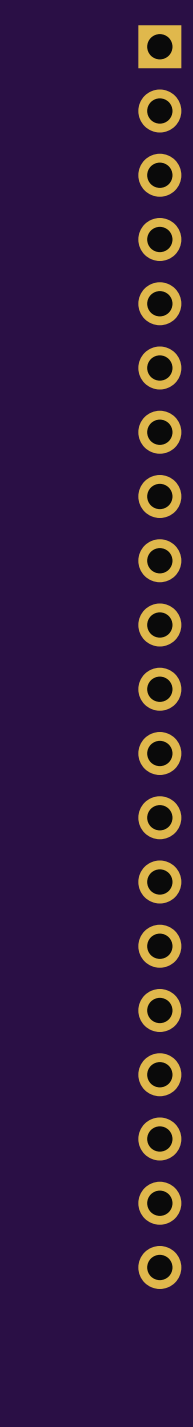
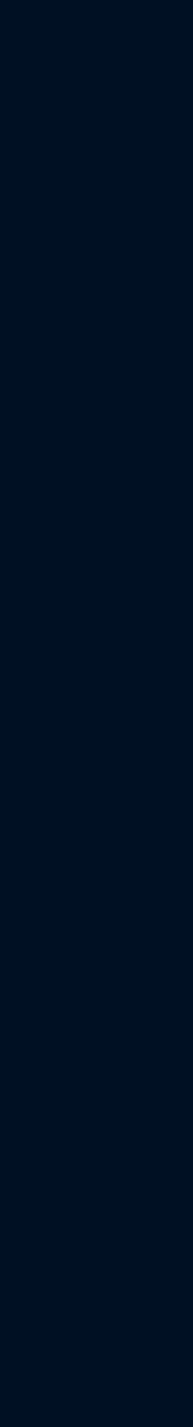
part: (159, 657) -> none

